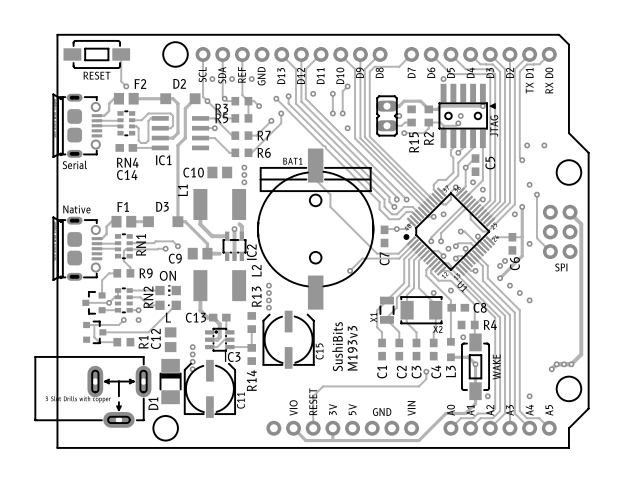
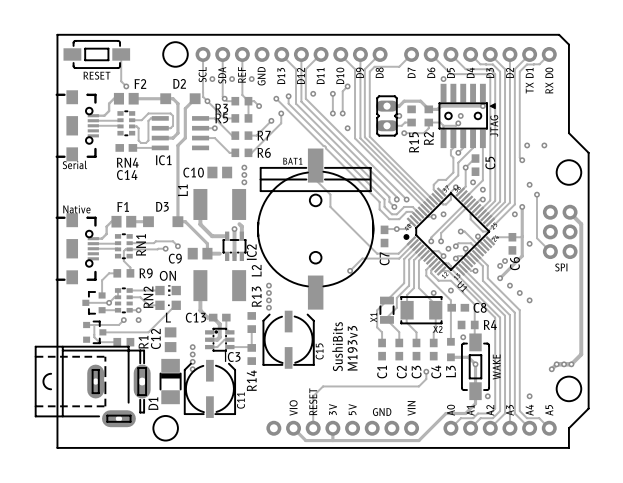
part footprint: [52, 93, 103, 158] -> [55, 90, 99, 162]
part footprint: [52, 216, 103, 281] -> [55, 213, 99, 285]
part footprint: [34, 356, 152, 428] -> [35, 346, 151, 428]

